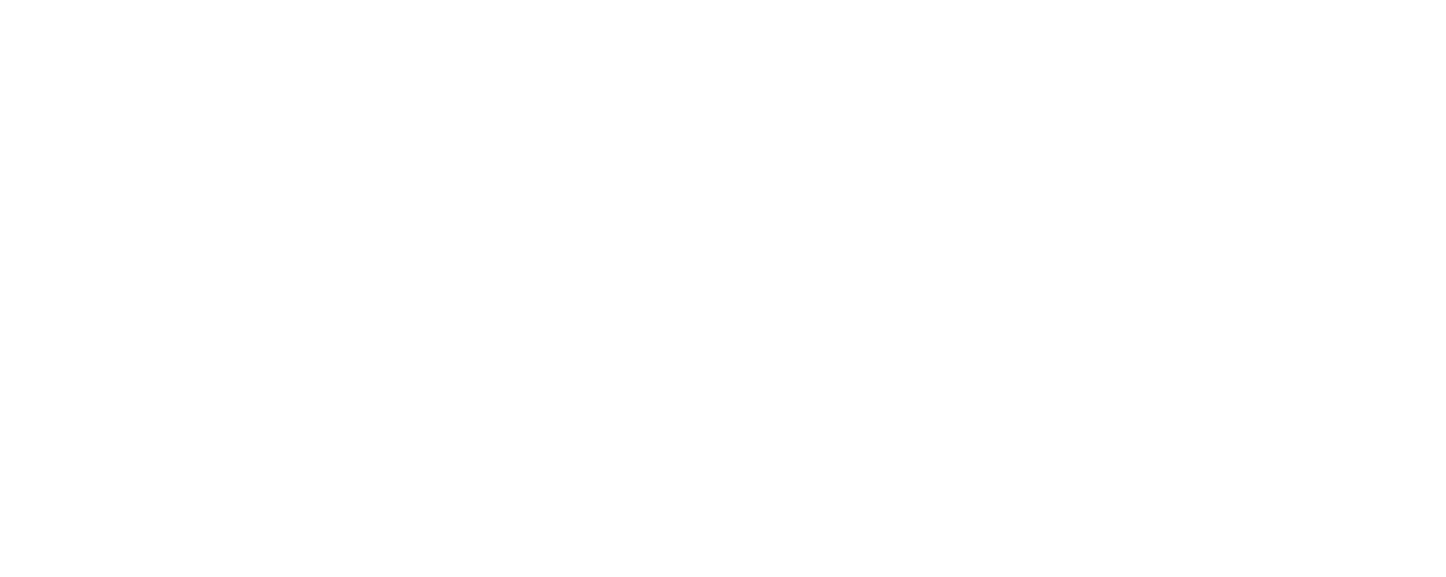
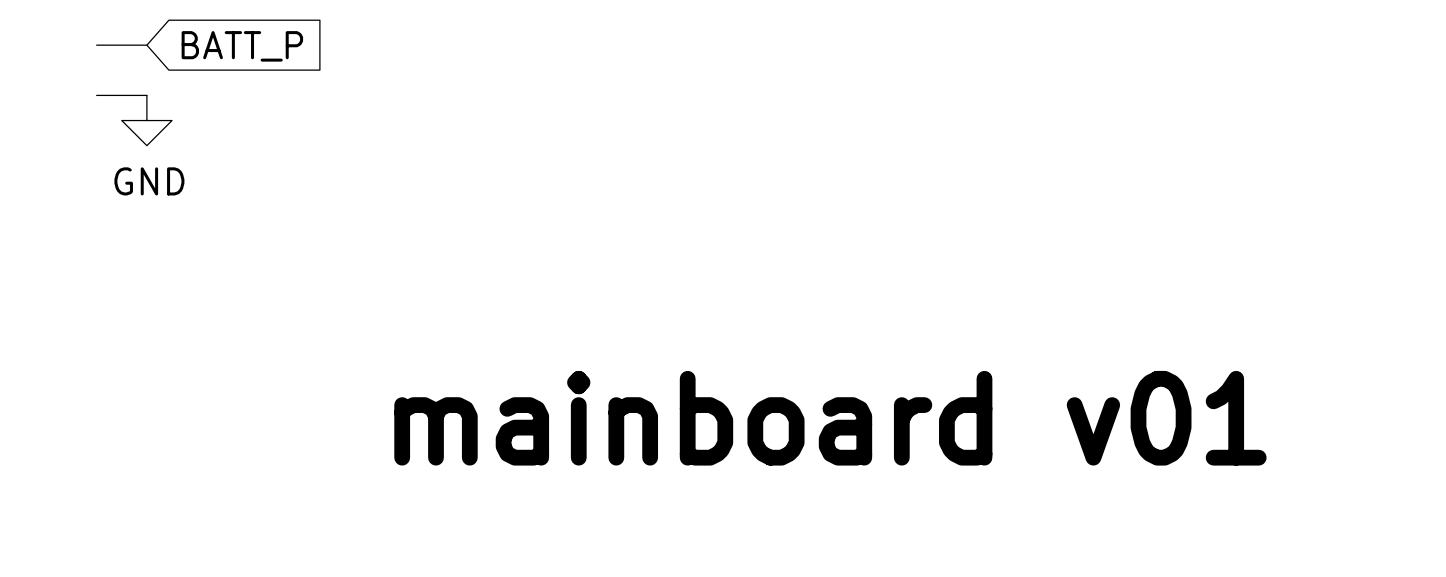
wire: none -> (96, 45) (146, 45)
global label: none -> BATT_P (242, 46)
wire: none -> (96, 95) (146, 95)
power symbol: none -> GND (146, 120)
text: none -> mainboard v01 (830, 418)

